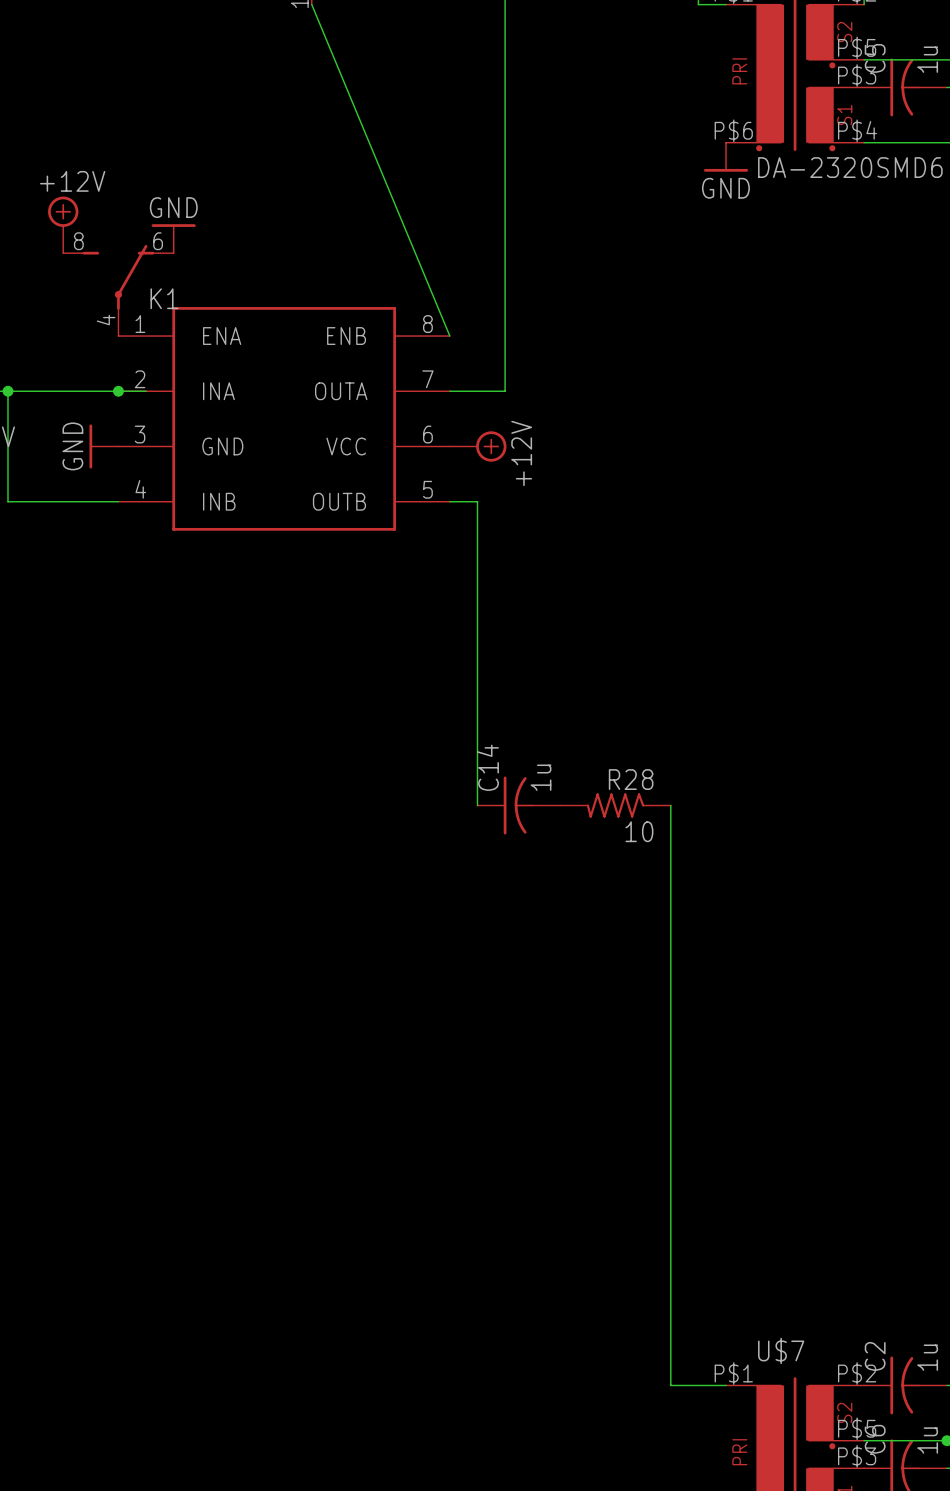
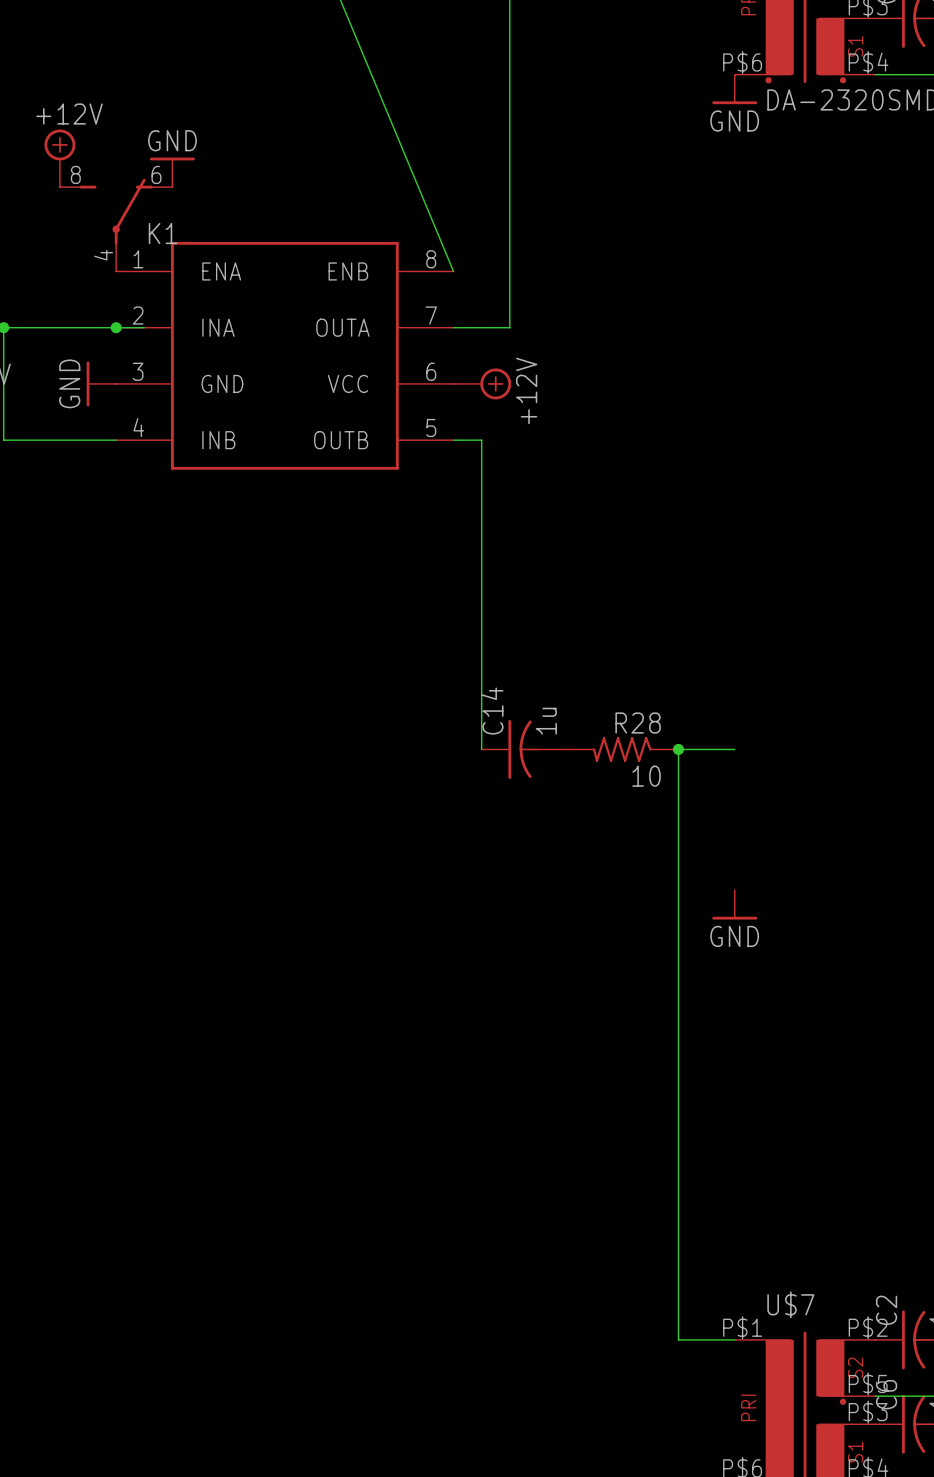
wire: none -> (678, 749) (734, 749)
junction: none -> (678, 749)
power symbol: none -> GND (734, 904)

